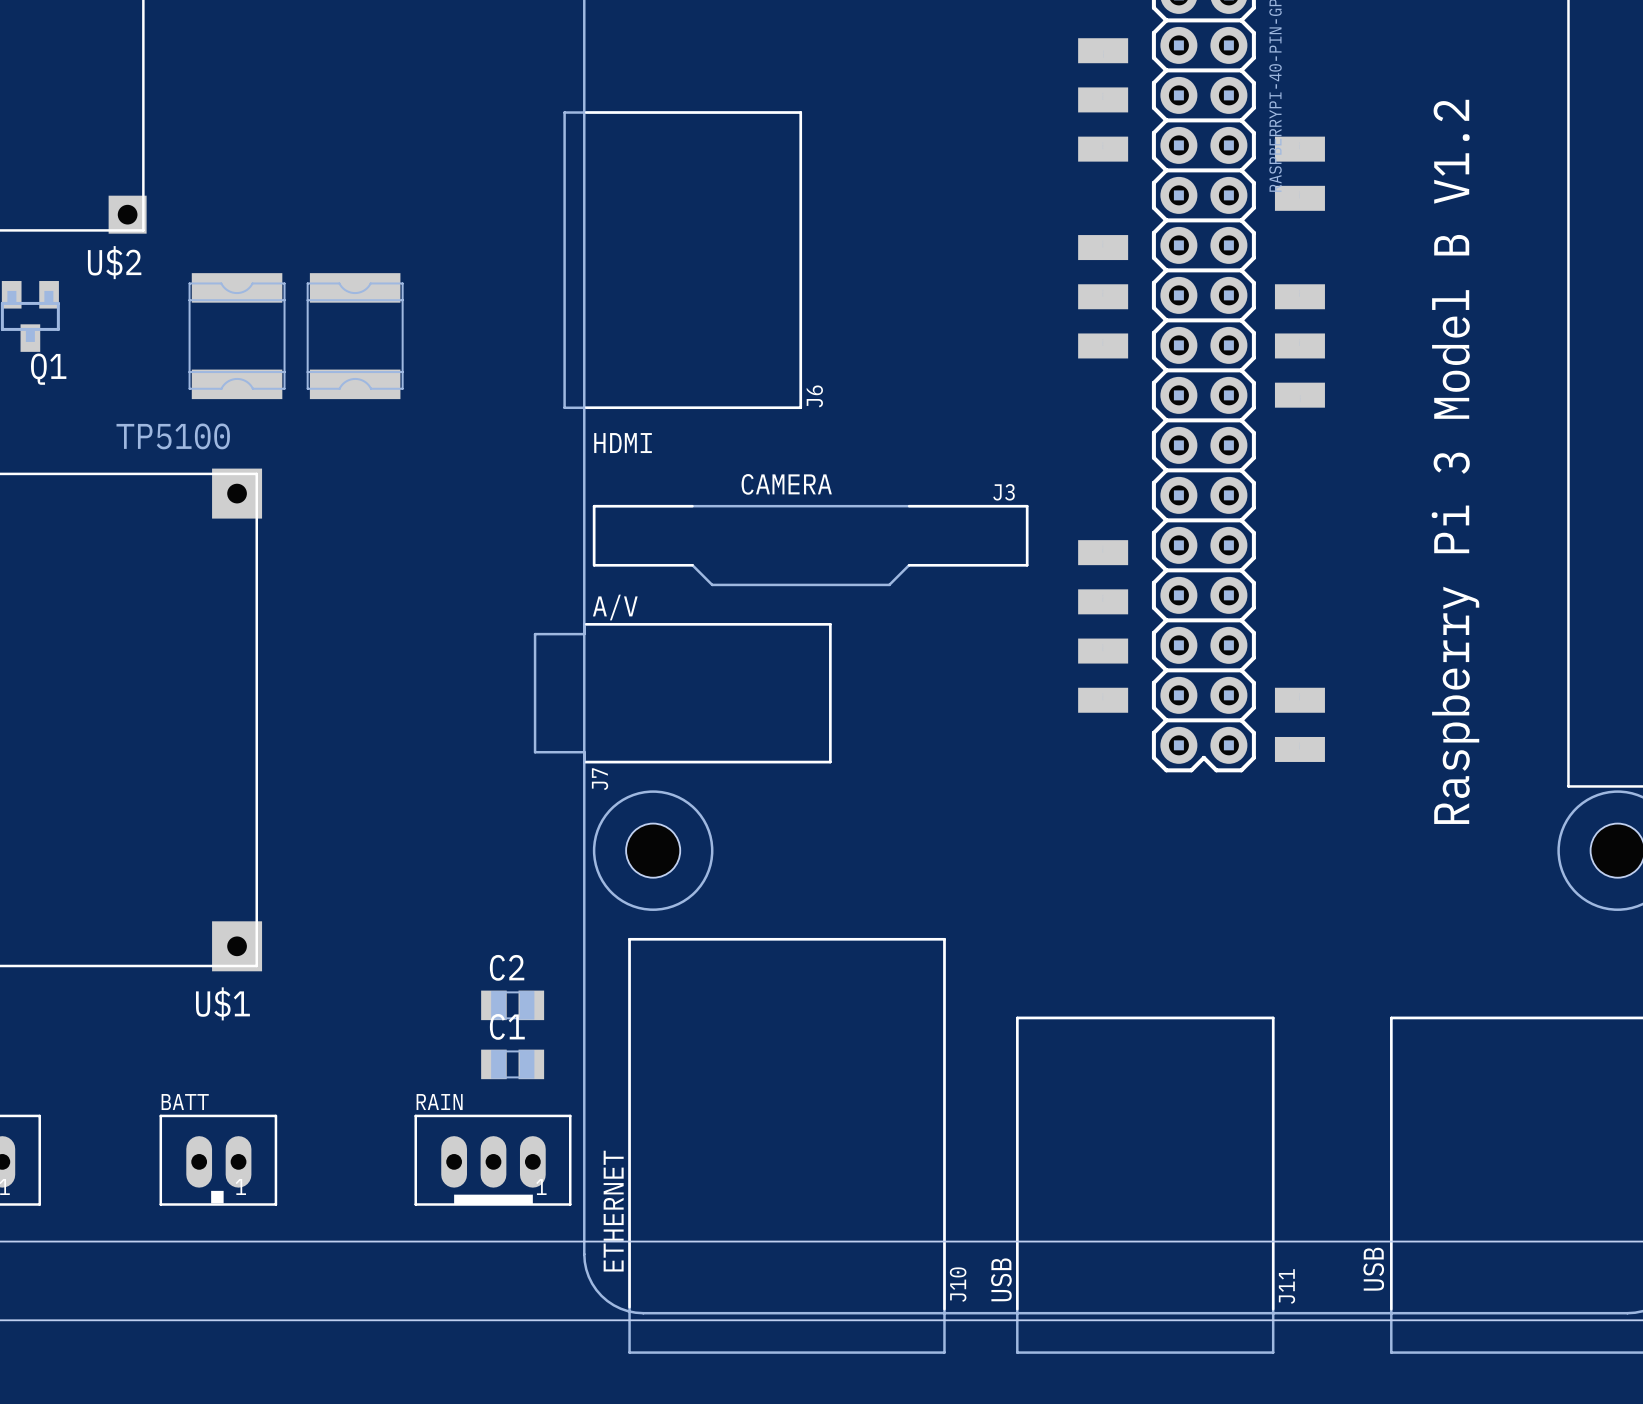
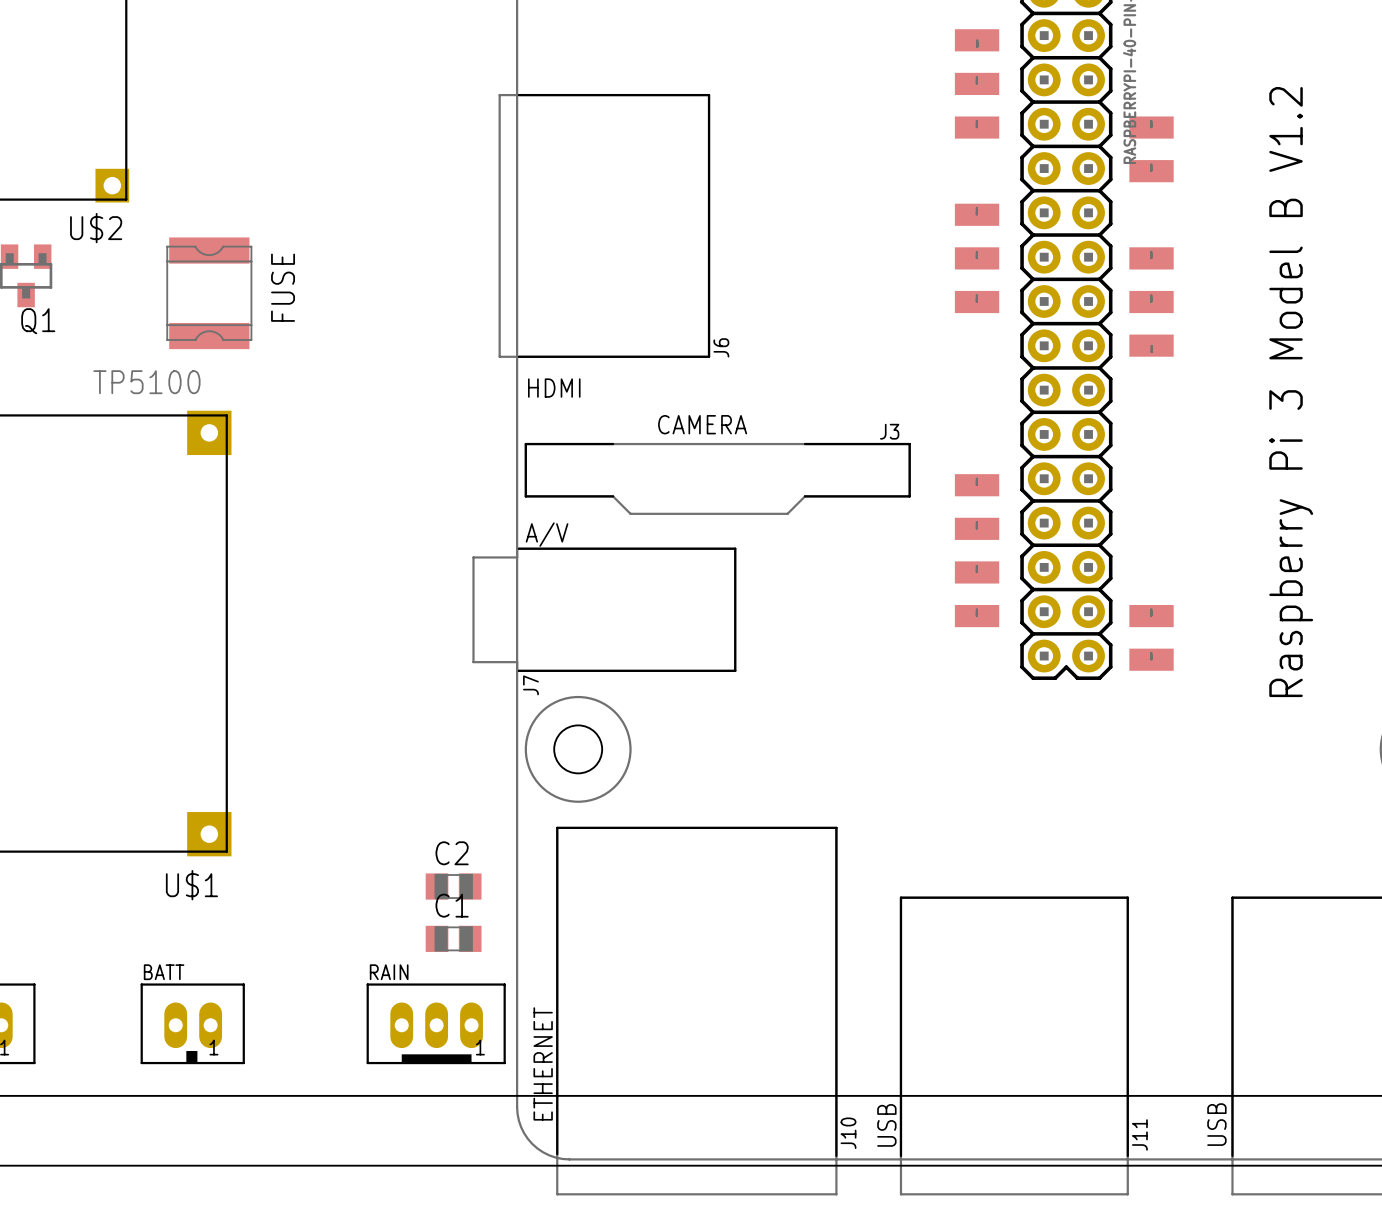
FUSE name: none -> FUSE (283, 287)
part: (355, 336) -> none

